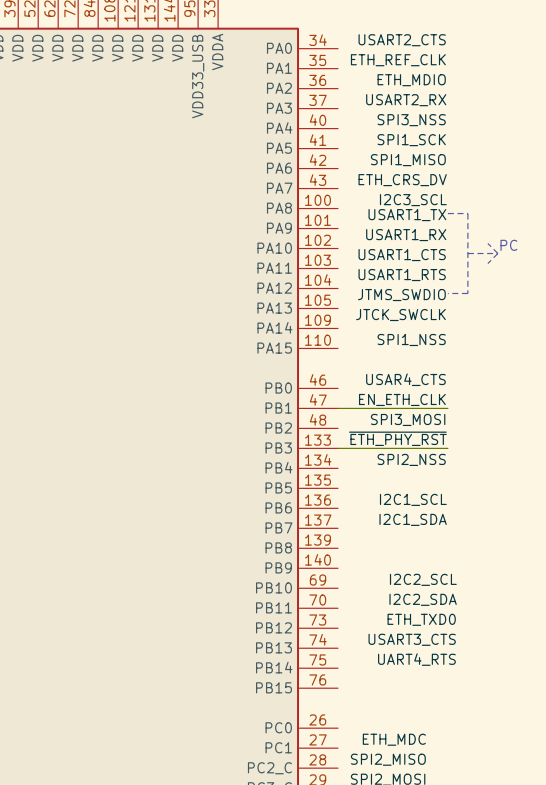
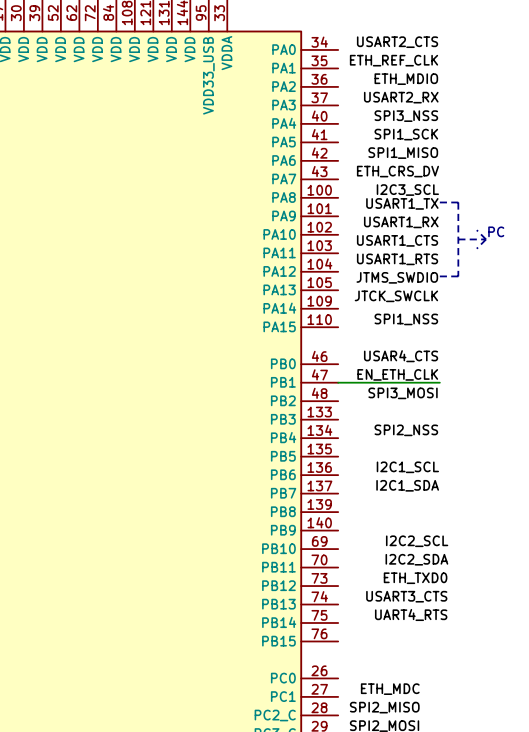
label: ~{ETH_PHY_RST} (397, 438) -> none
wire: (337, 448) (447, 448) -> none

